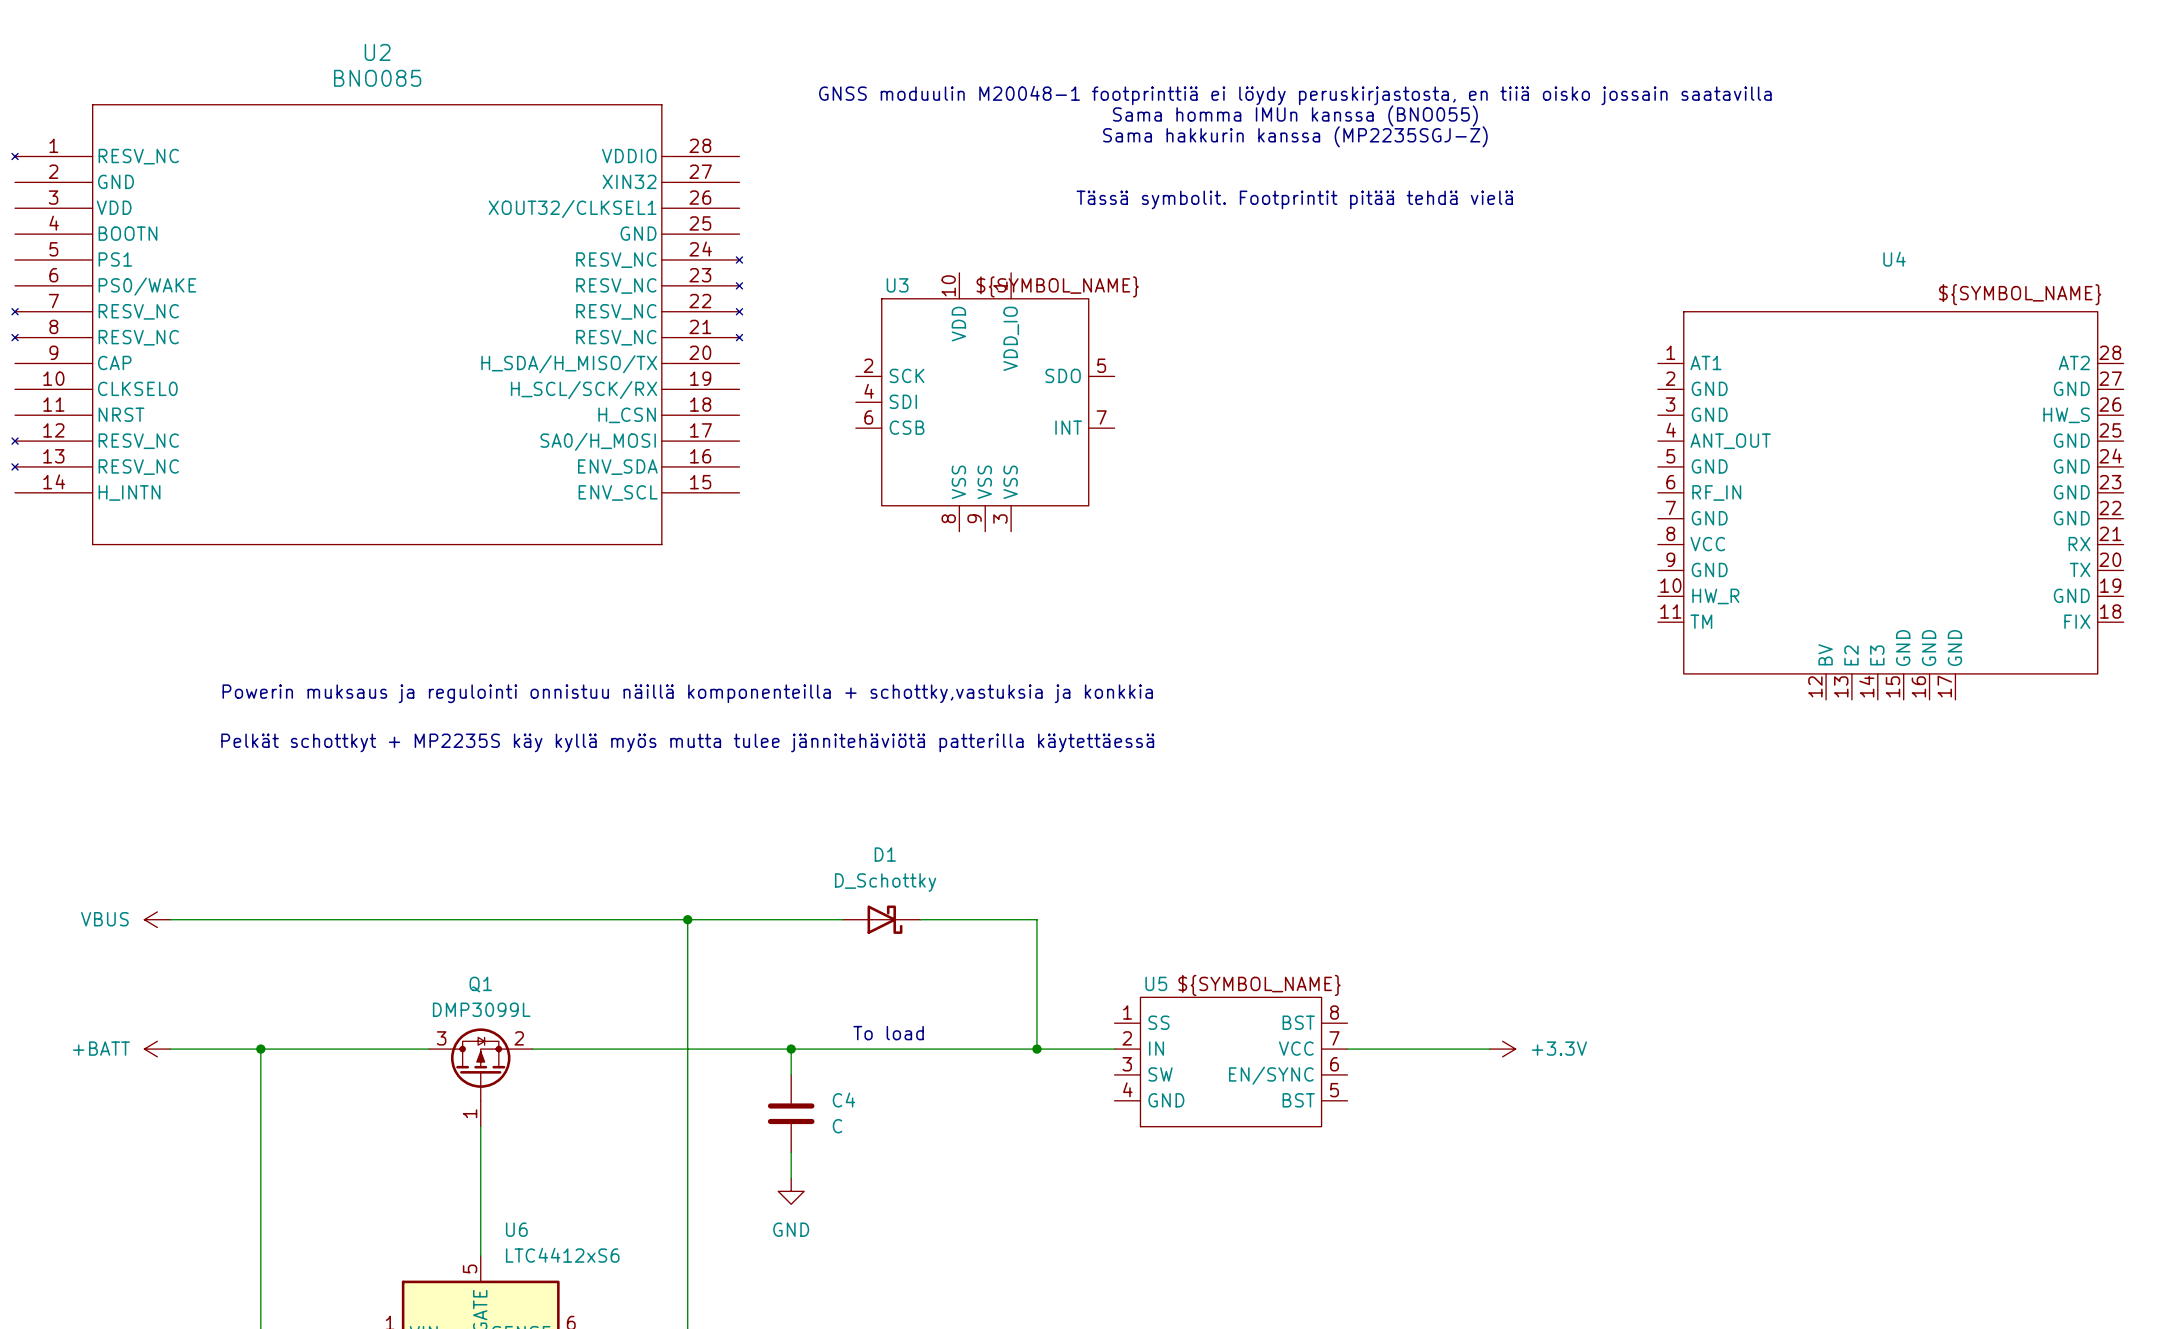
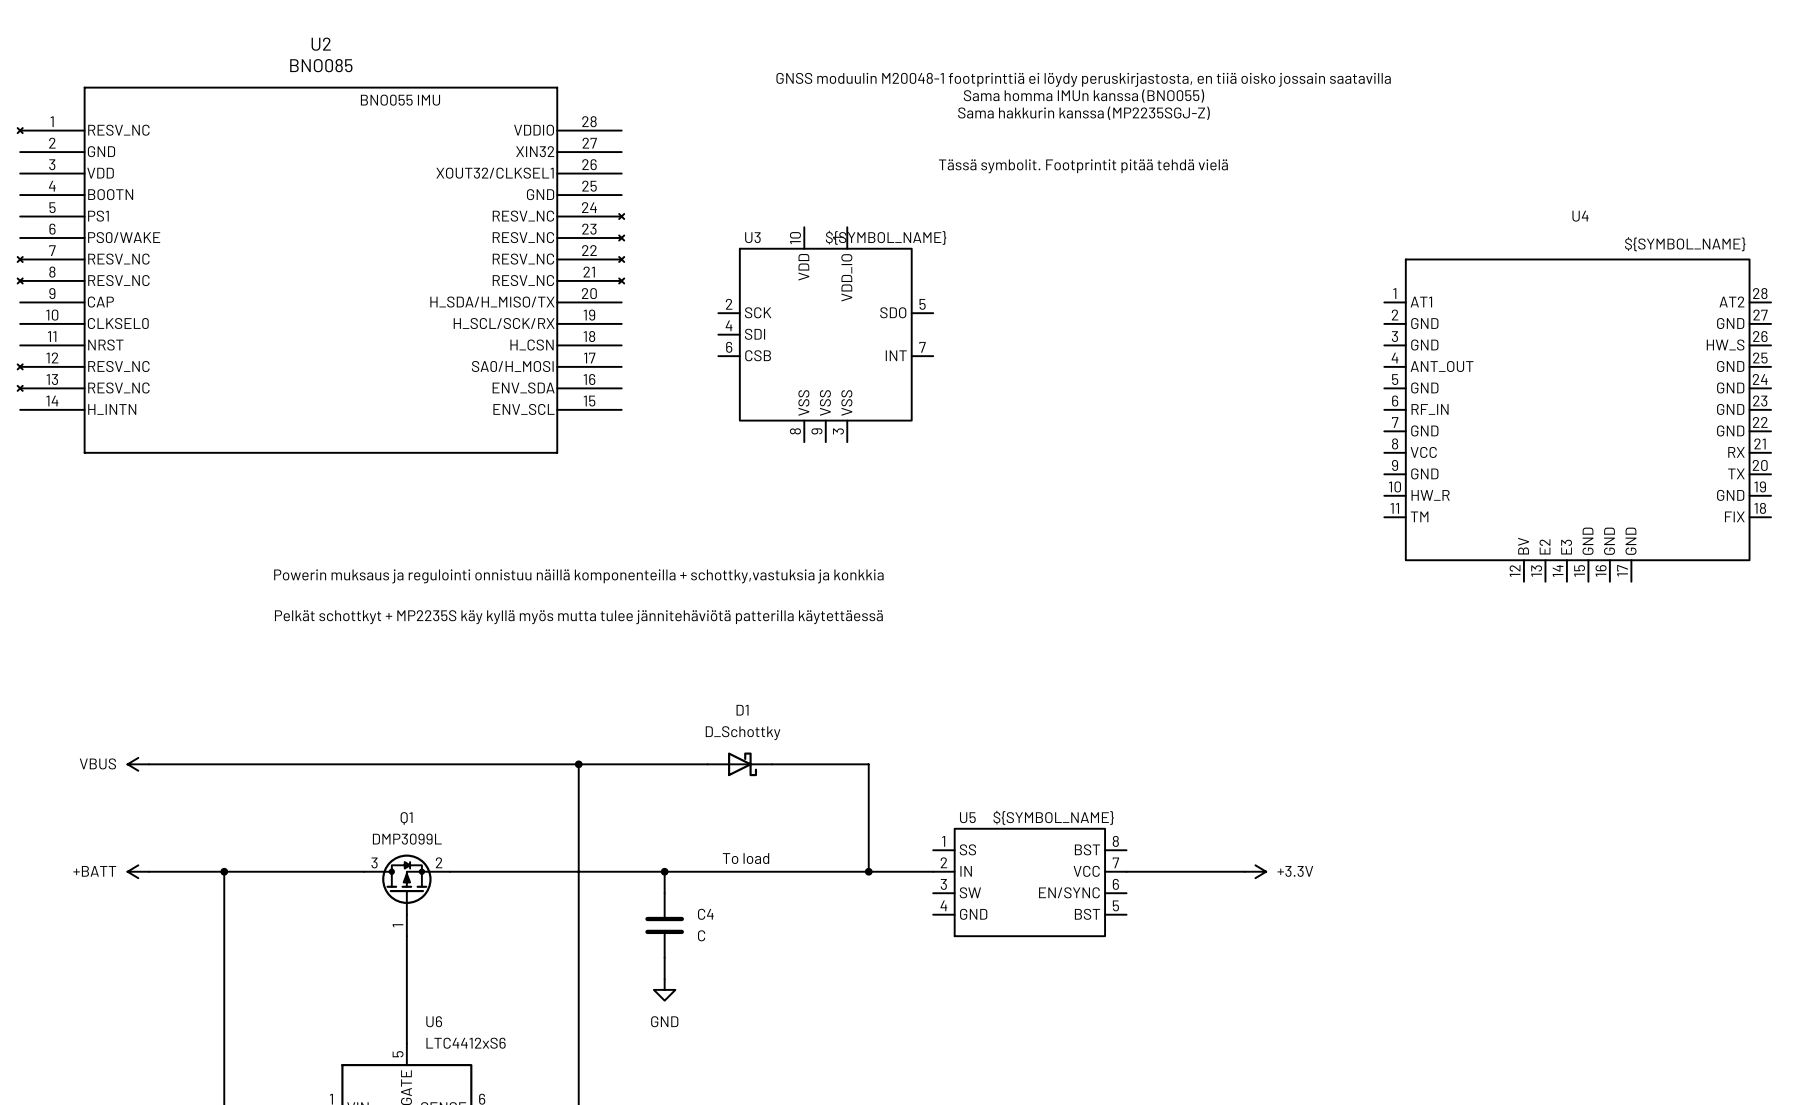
text: none -> BNO055 IMU (400, 100)

